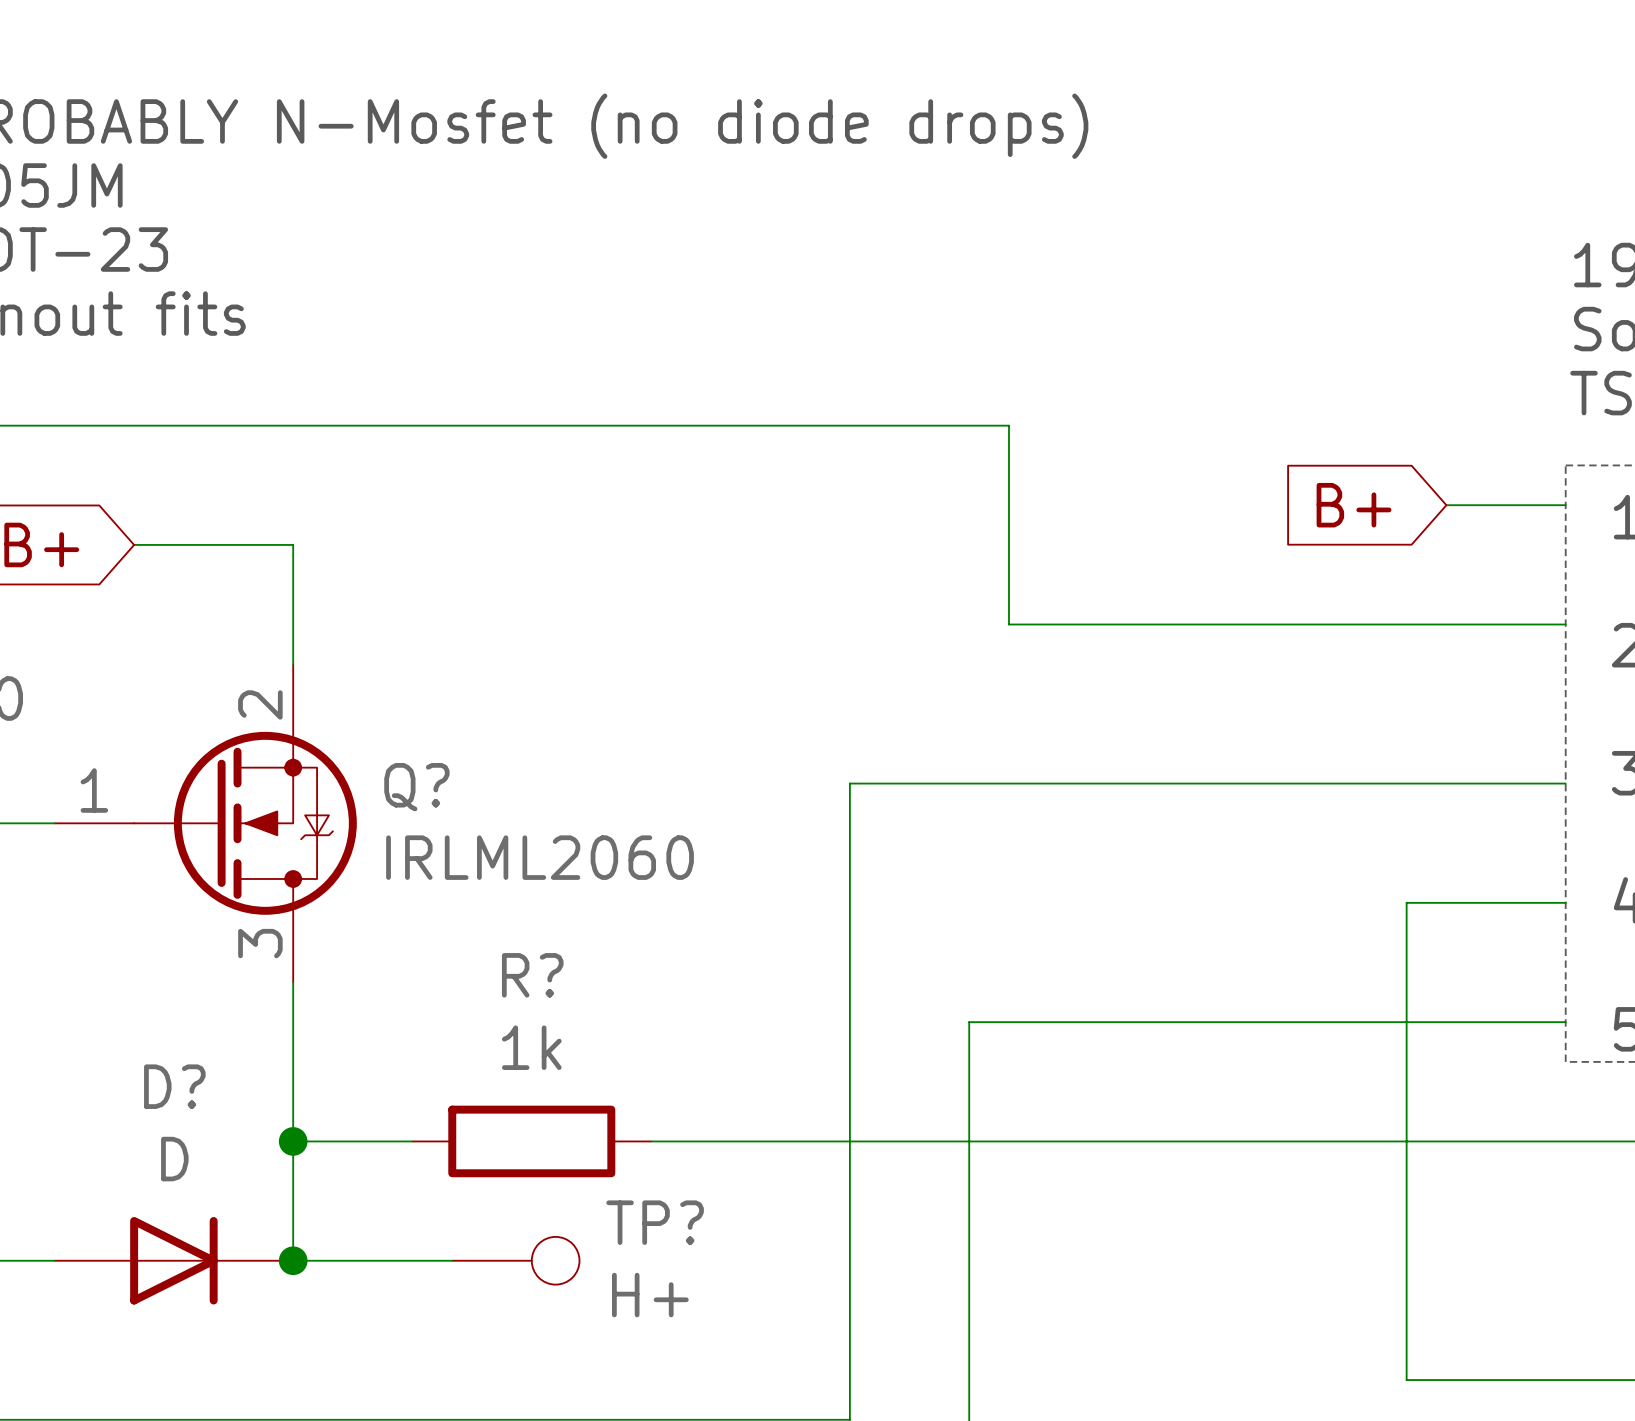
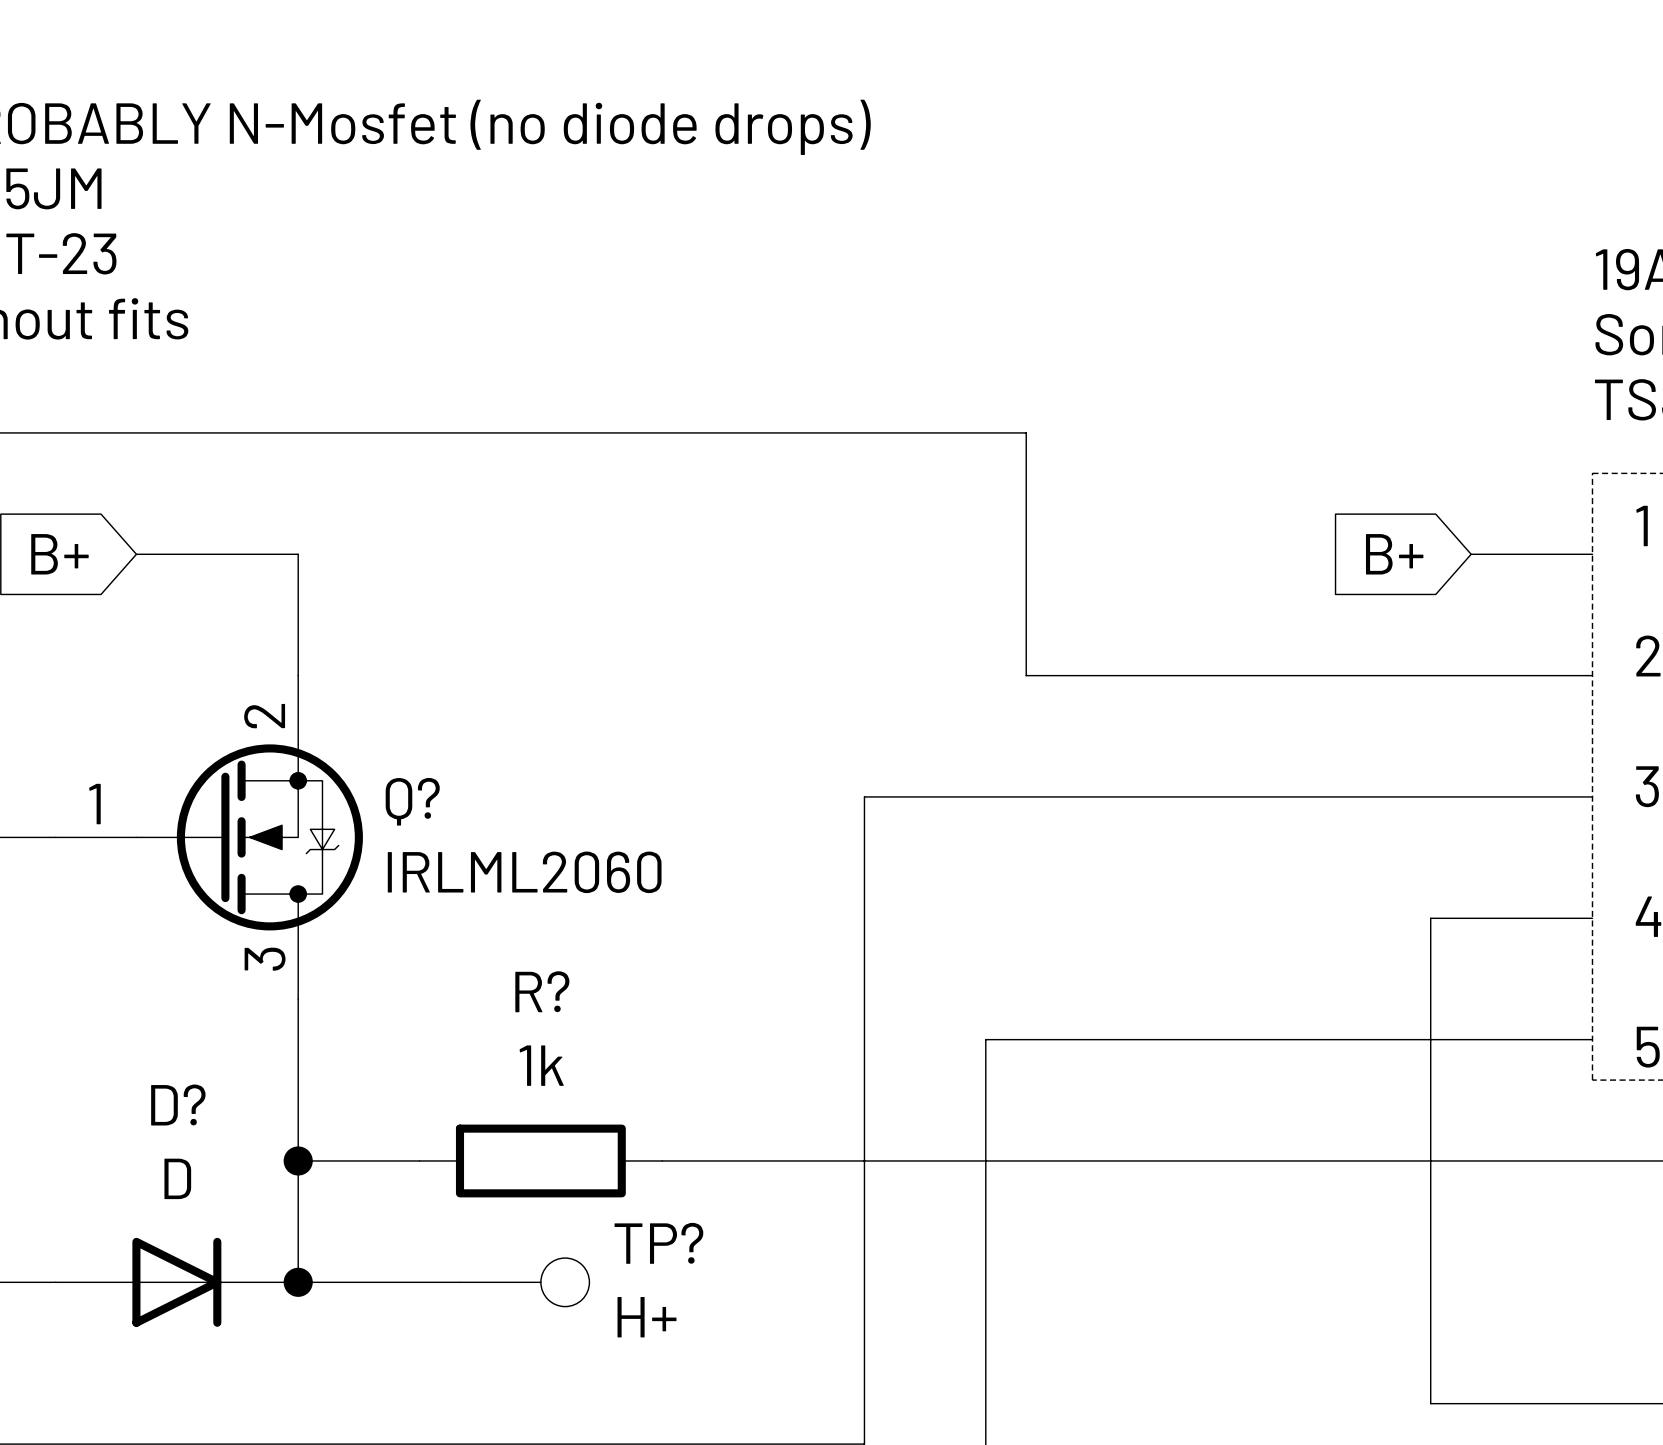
global label position: B+ (1354, 505) -> B+ (1394, 554)
wire: (1446, 505) (1565, 505) -> (1471, 554) (1592, 554)
wire: (1008, 624) (1565, 624) -> (1026, 635) (1026, 675) (1592, 675)

